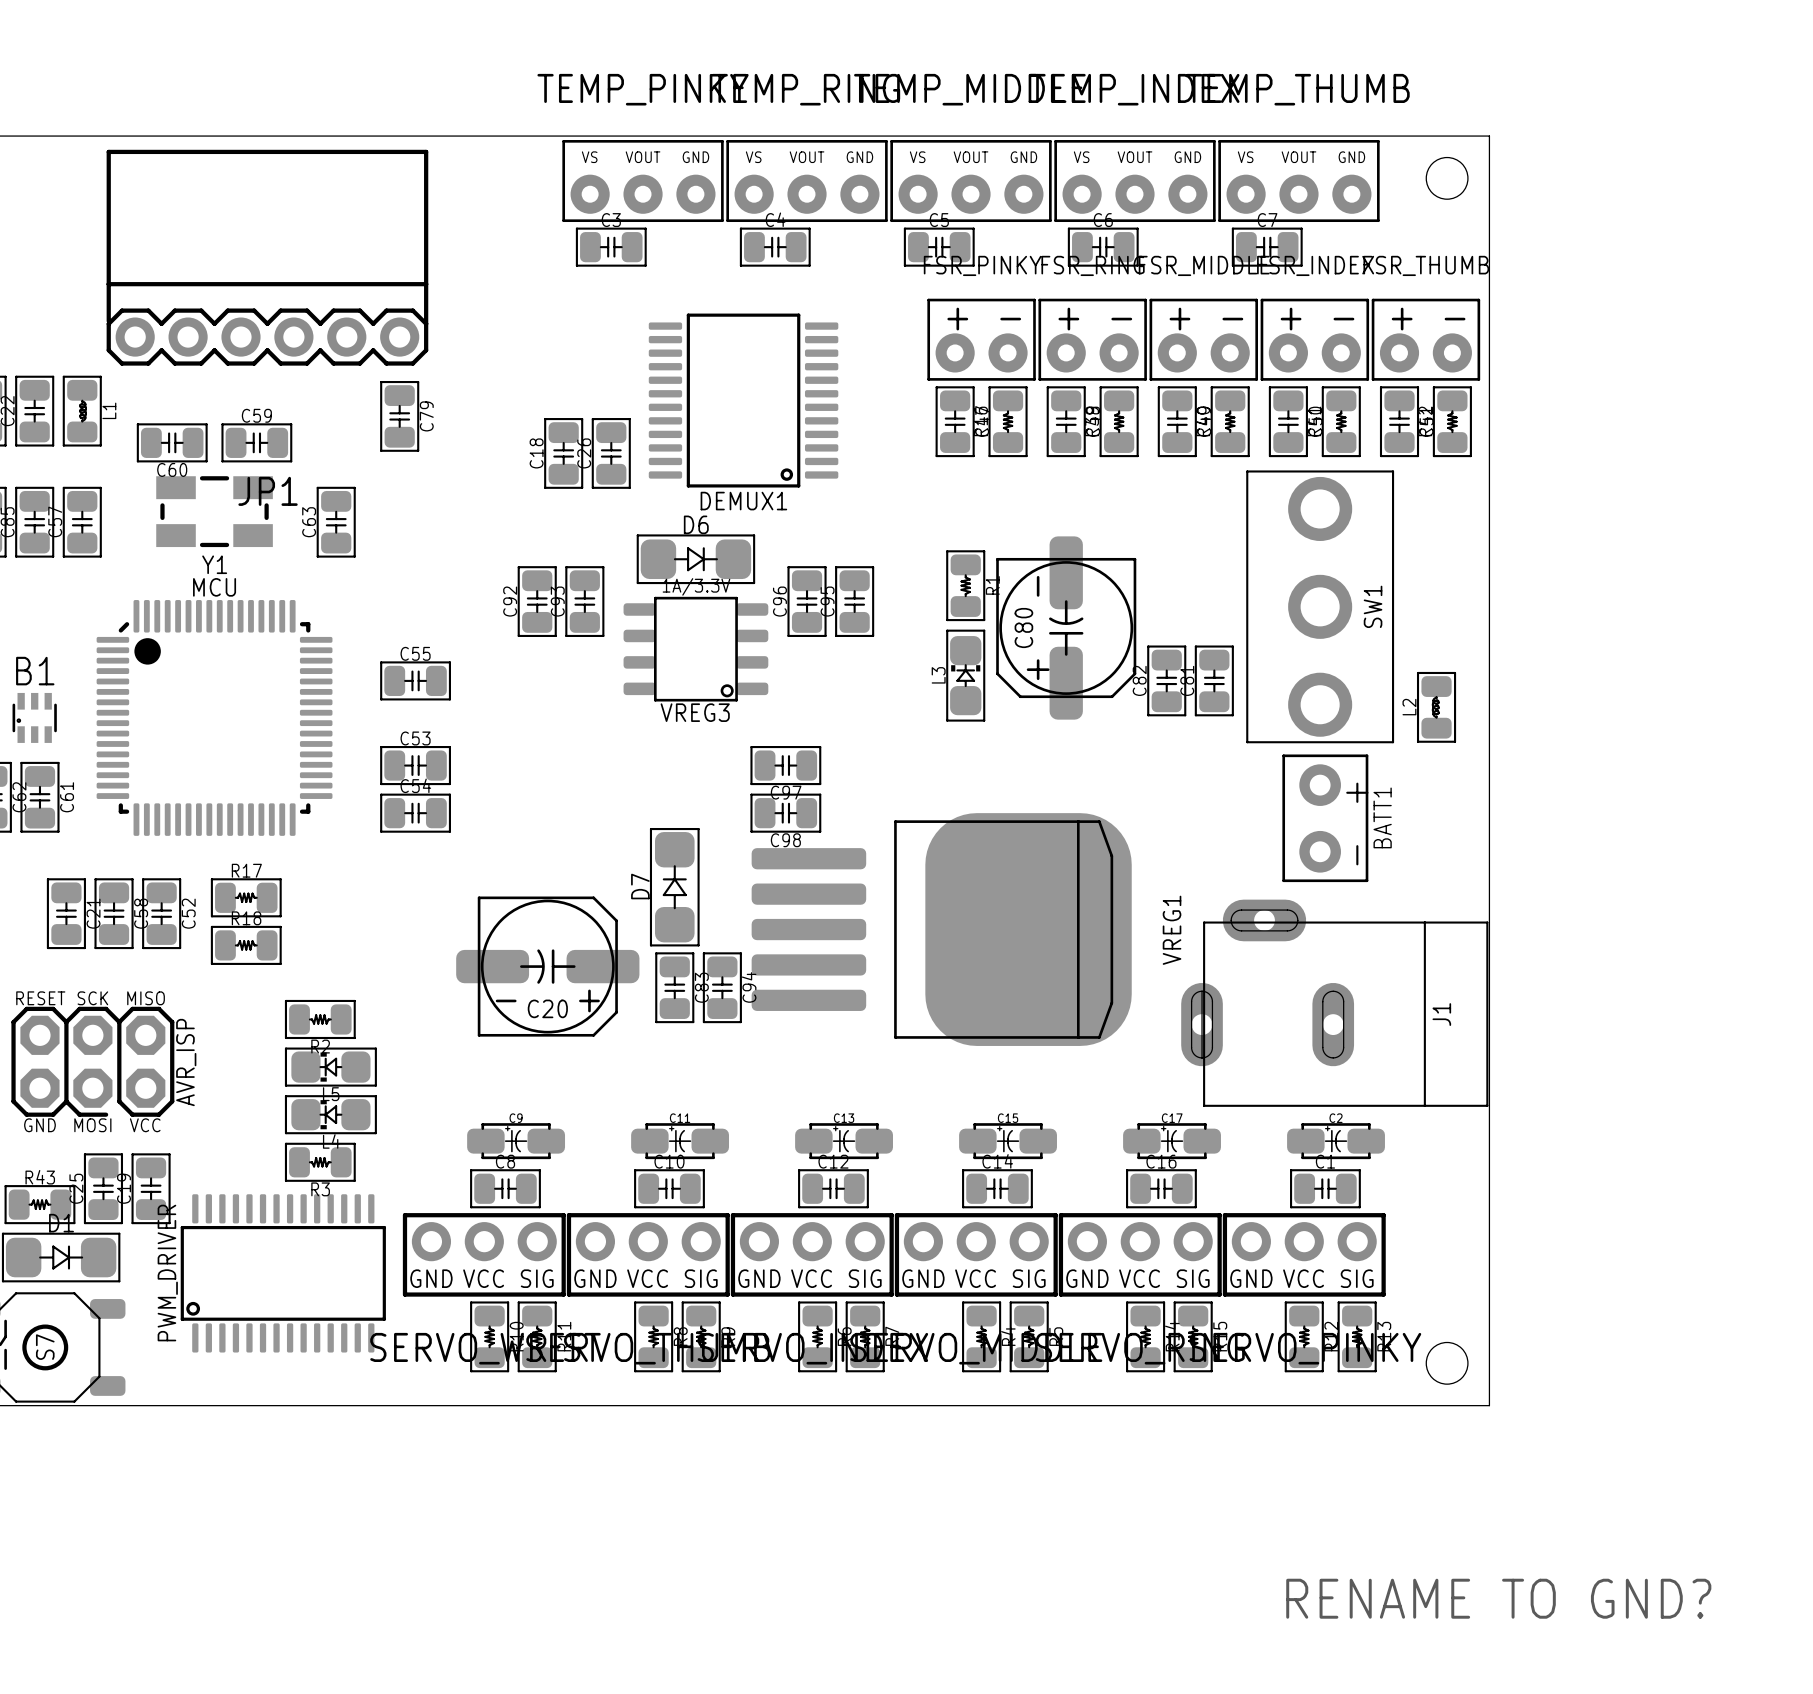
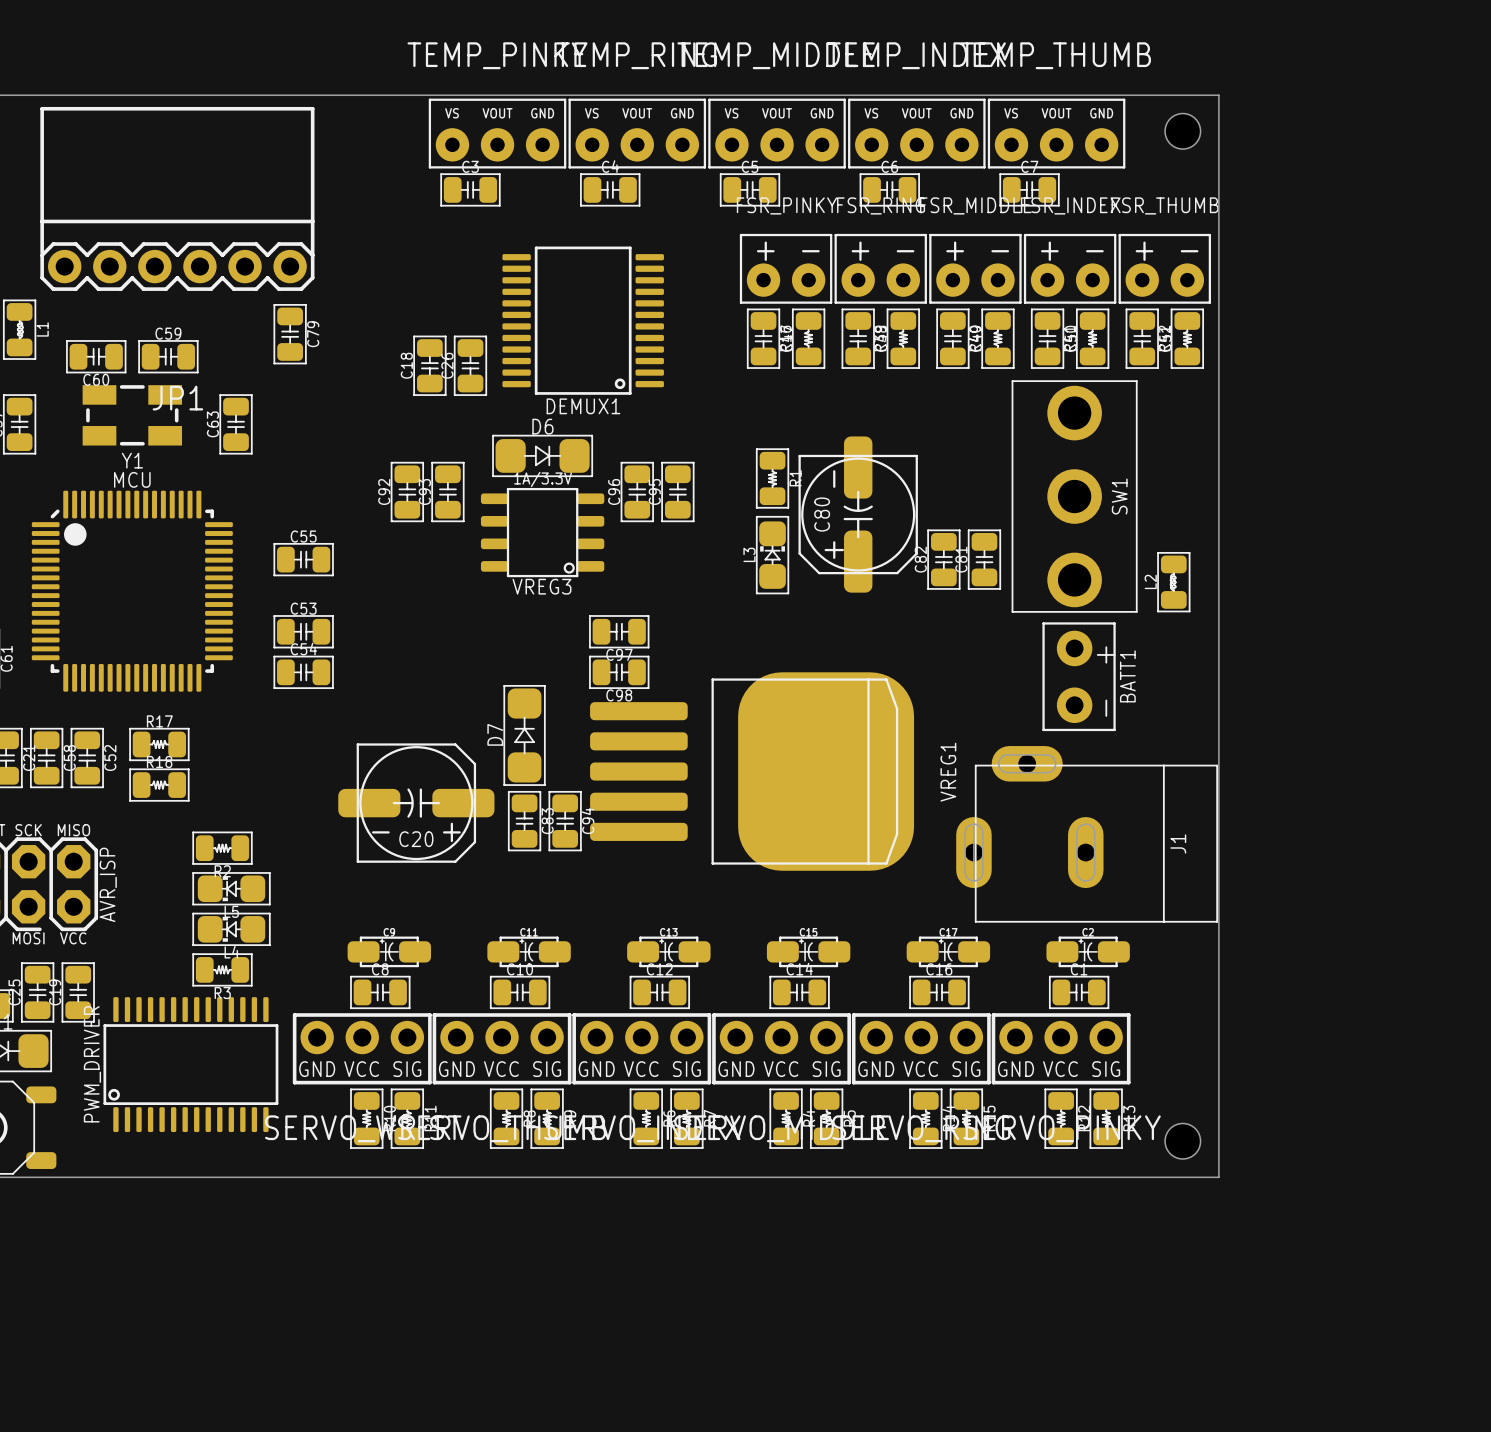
text: RENAME TO GND? (1498, 1598) -> none

